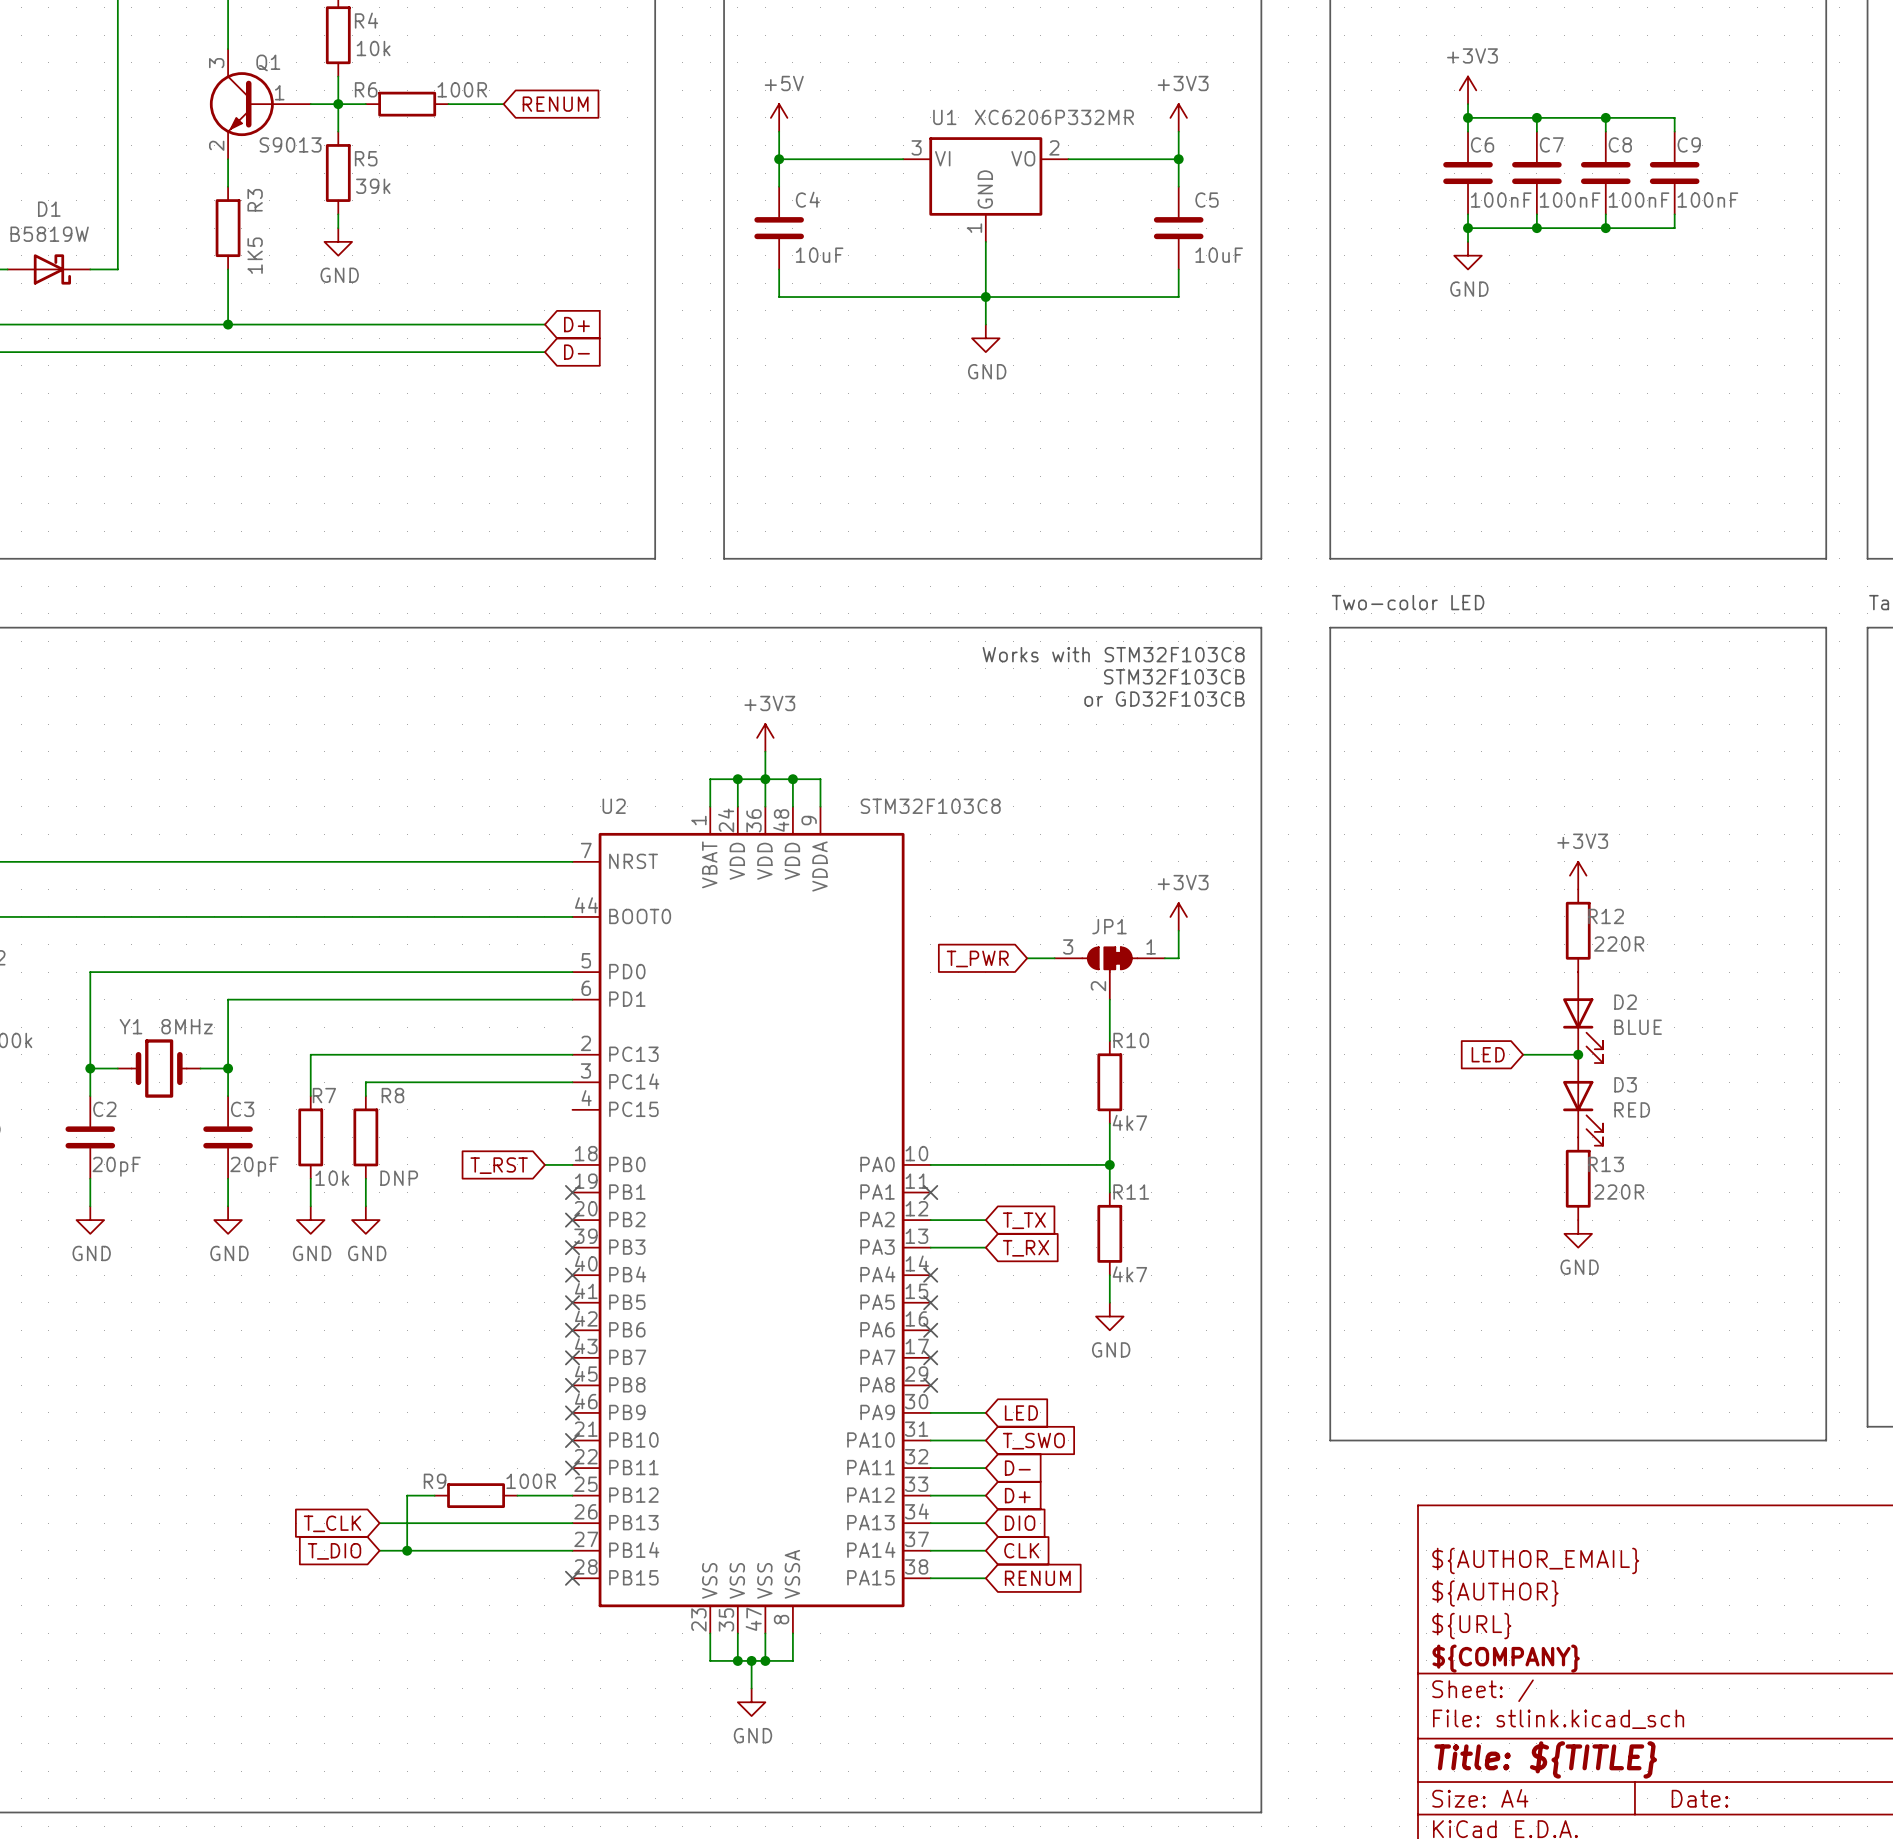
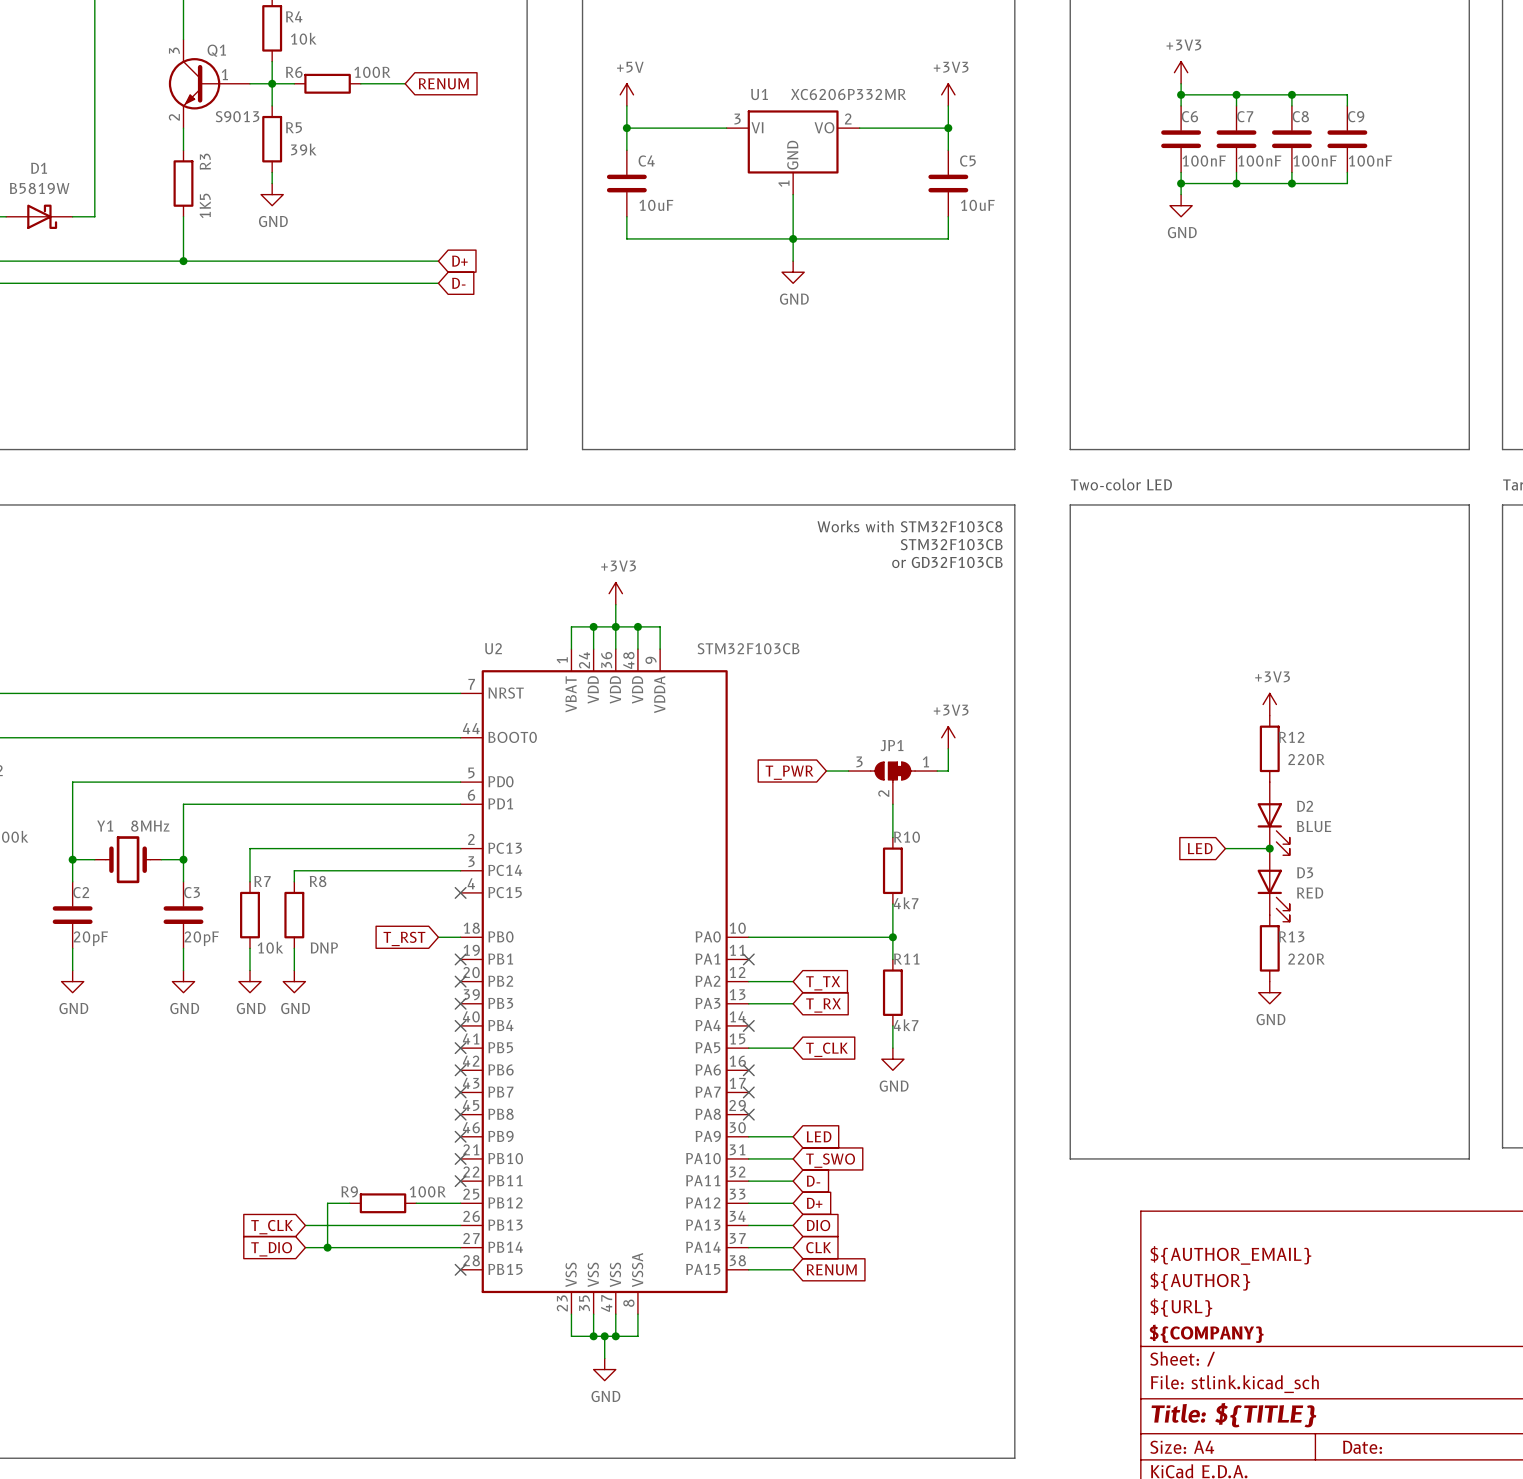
U2 value: STM32F103C8 (930, 806) -> STM32F103CB (748, 648)
no-connect mark: none -> (460, 892)
wire: none -> (748, 1048) (793, 1048)
no-connect mark: (930, 1302) -> none
global label: none -> T_CLK (827, 1049)

